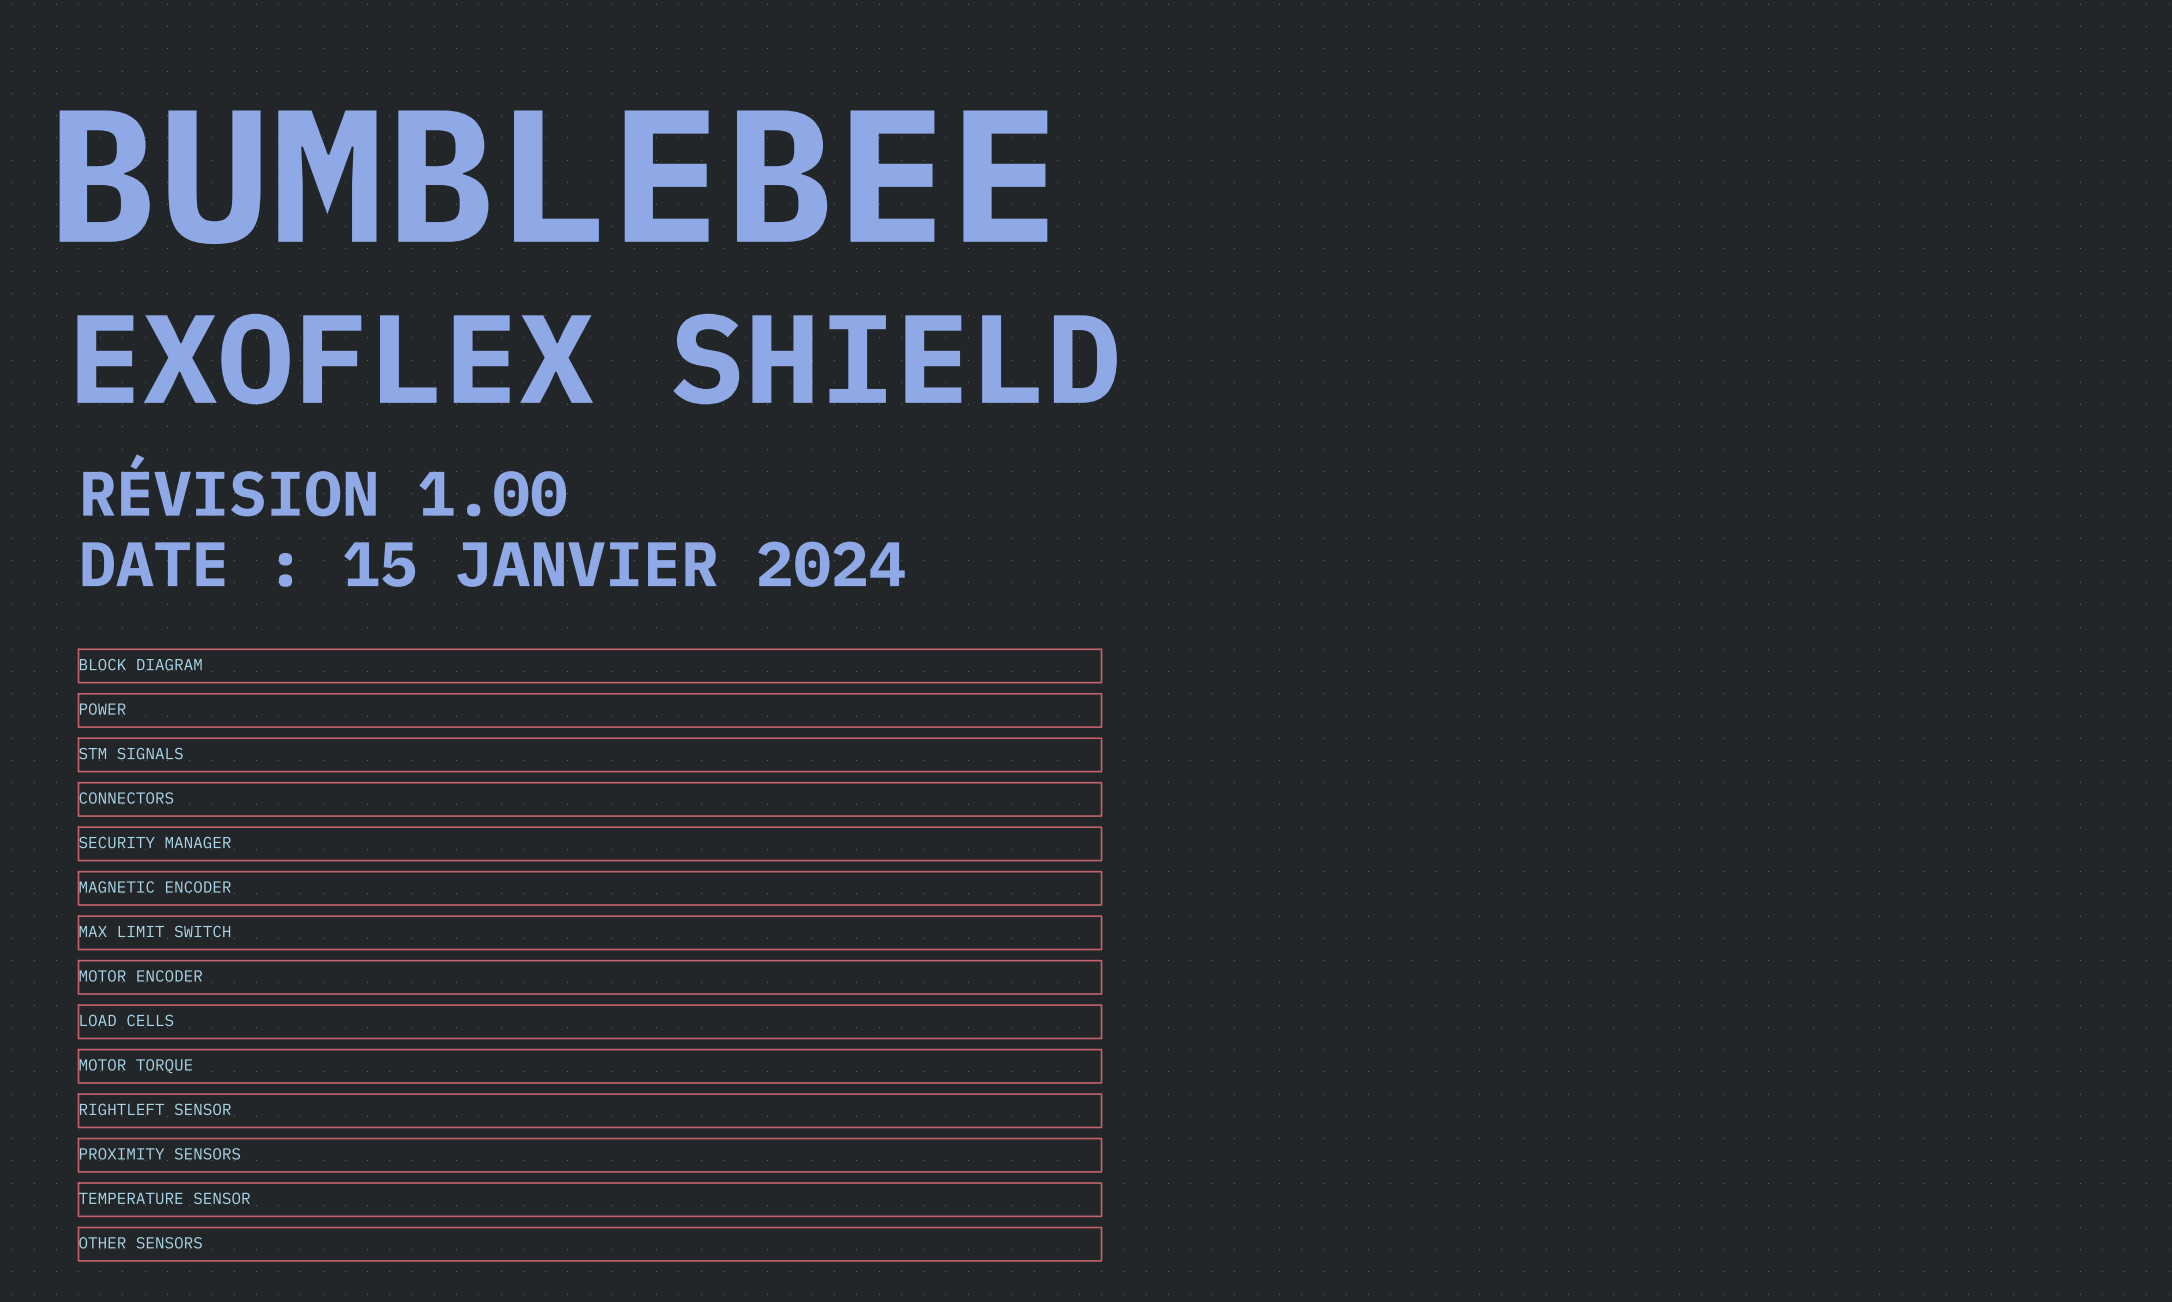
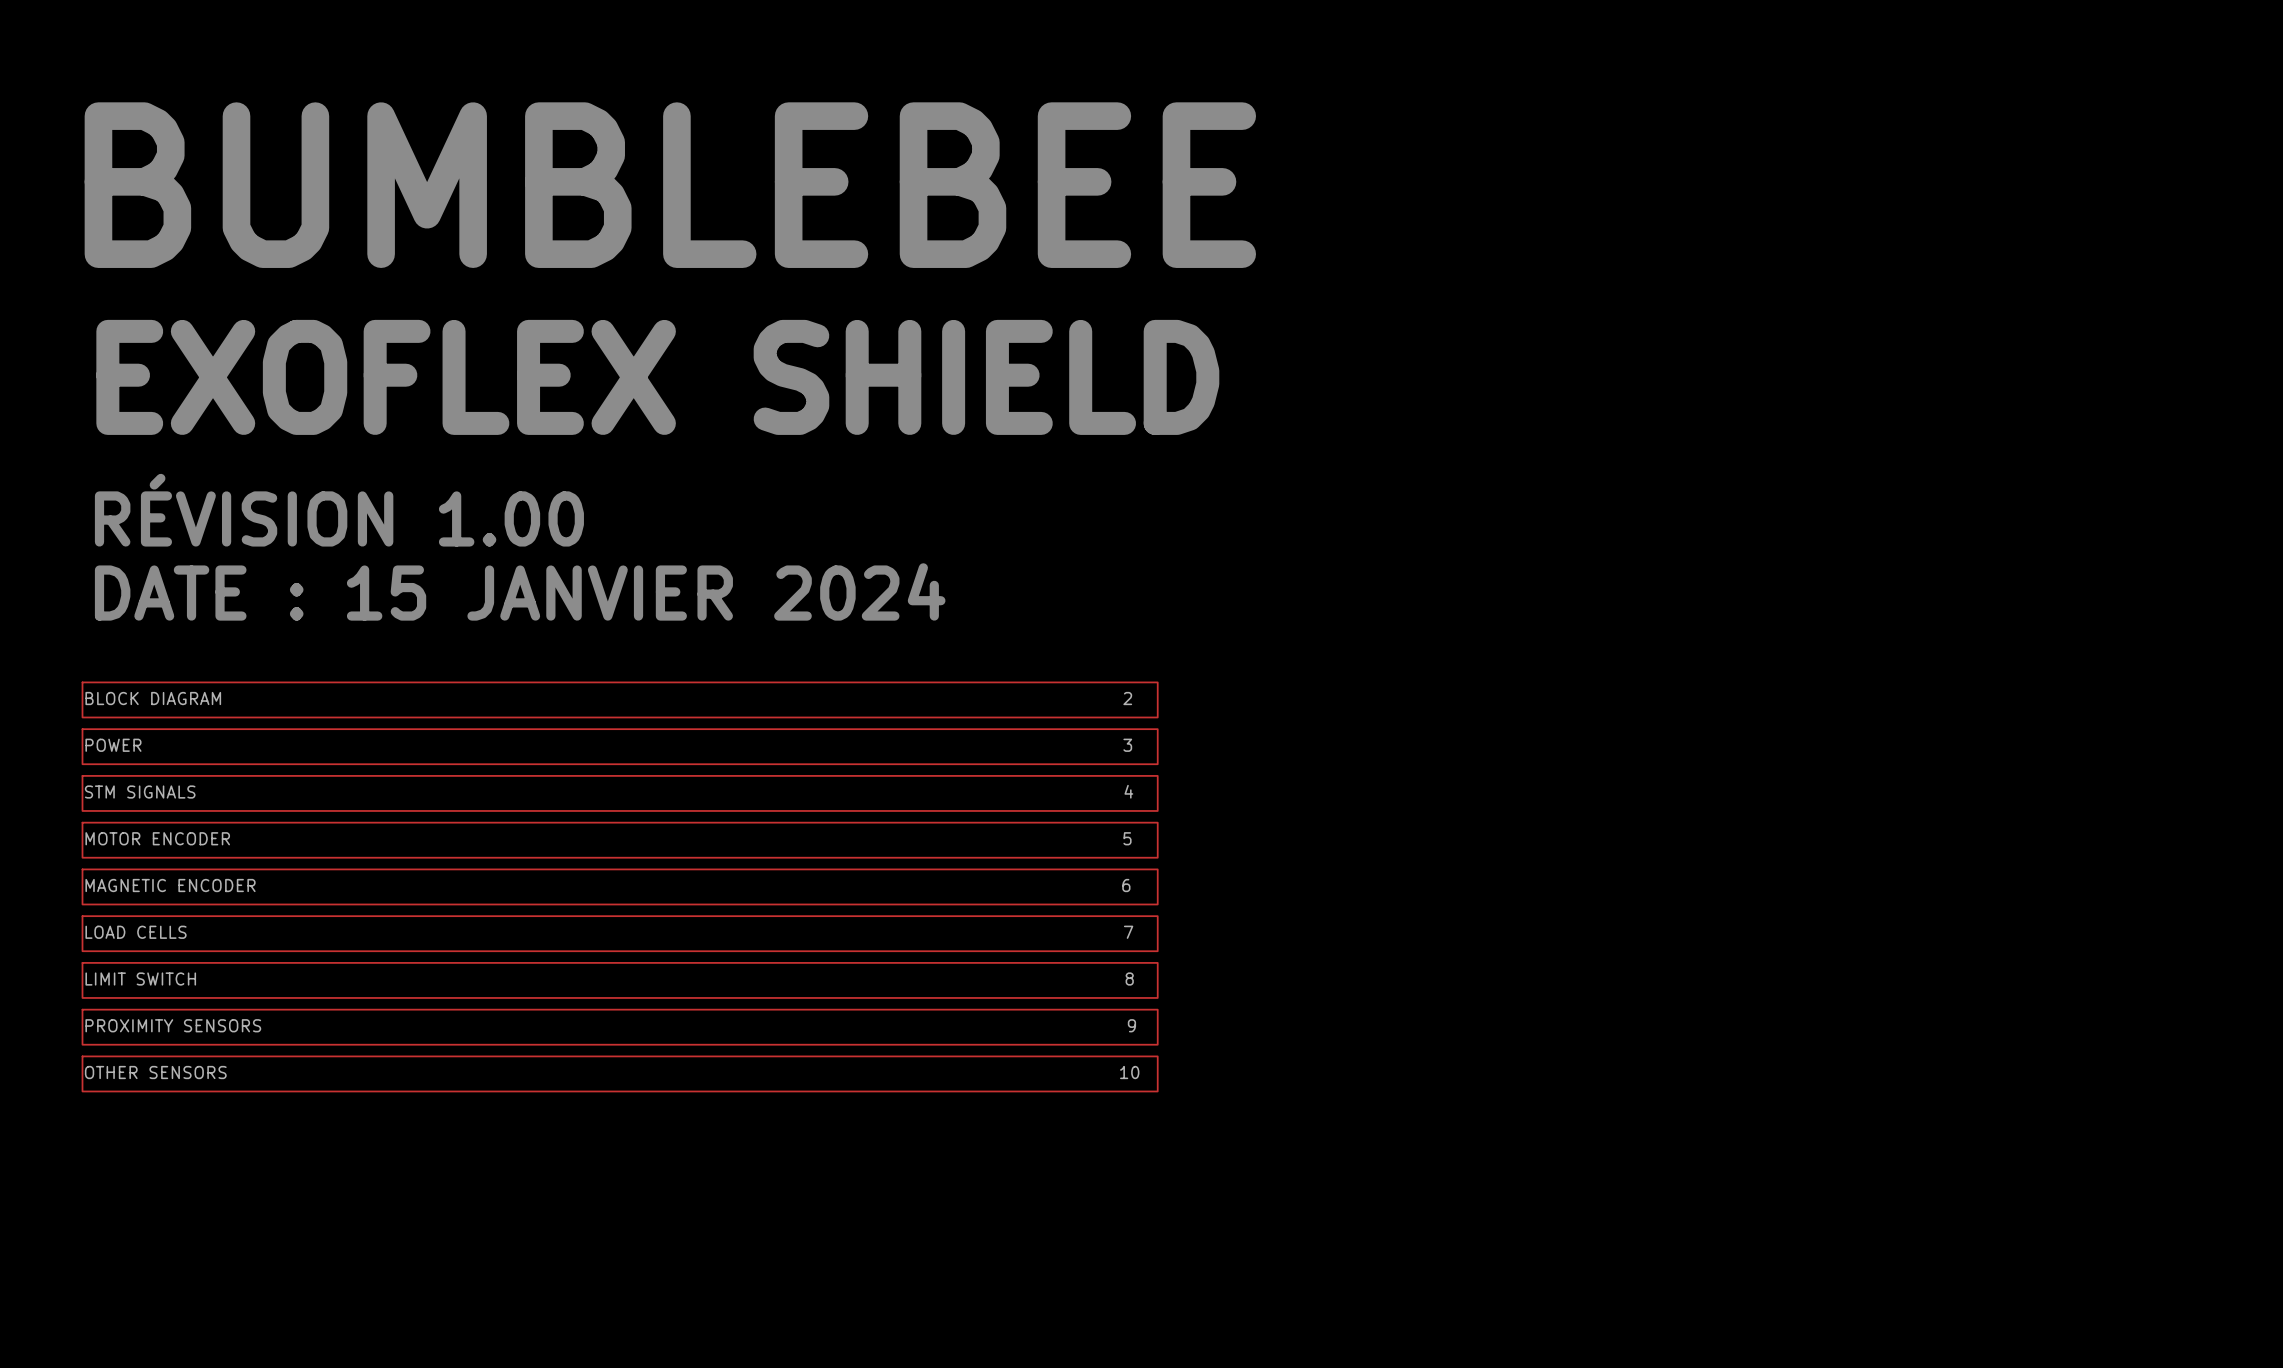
sheet BLOCK DIAGRAM name: BLOCK DIAGRAM (140, 664) -> BLOCK DIAGRAM 2 (608, 698)
sheet POWER name: POWER (102, 709) -> POWER 3 (608, 745)
sheet STM SIGNALS name: STM SIGNALS (130, 753) -> STM SIGNALS 4 (609, 791)
sheet CONNECTORS name: CONNECTORS (126, 798) -> MOTOR ENCODER 5 (608, 838)
sheet SECURITY MANAGER name: SECURITY MANAGER (154, 842) -> MAGNETIC ENCODER 6 (607, 885)
sheet MAGNETIC ENCODER name: MAGNETIC ENCODER (155, 887) -> LOAD CELLS 7 (609, 932)
sheet MAX LIMIT SWITCH name: MAX LIMIT SWITCH (154, 931) -> LIMIT SWITCH 8 (609, 979)
sheet MOTOR ENCODER name: MOTOR ENCODER (140, 975) -> PROXIMITY SENSORS 9 (610, 1025)
sheet LOAD CELLS name: LOAD CELLS (126, 1020) -> OTHER SENSORS 10 (612, 1072)
sheet MOTOR TORQUE: (590, 1066) -> none
sheet RIGHTLEFT SENSOR: (590, 1110) -> none
sheet PROXIMITY SENSORS: (590, 1155) -> none
sheet TEMPERATURE SENSOR: (590, 1199) -> none
sheet OTHER SENSORS: (590, 1244) -> none

